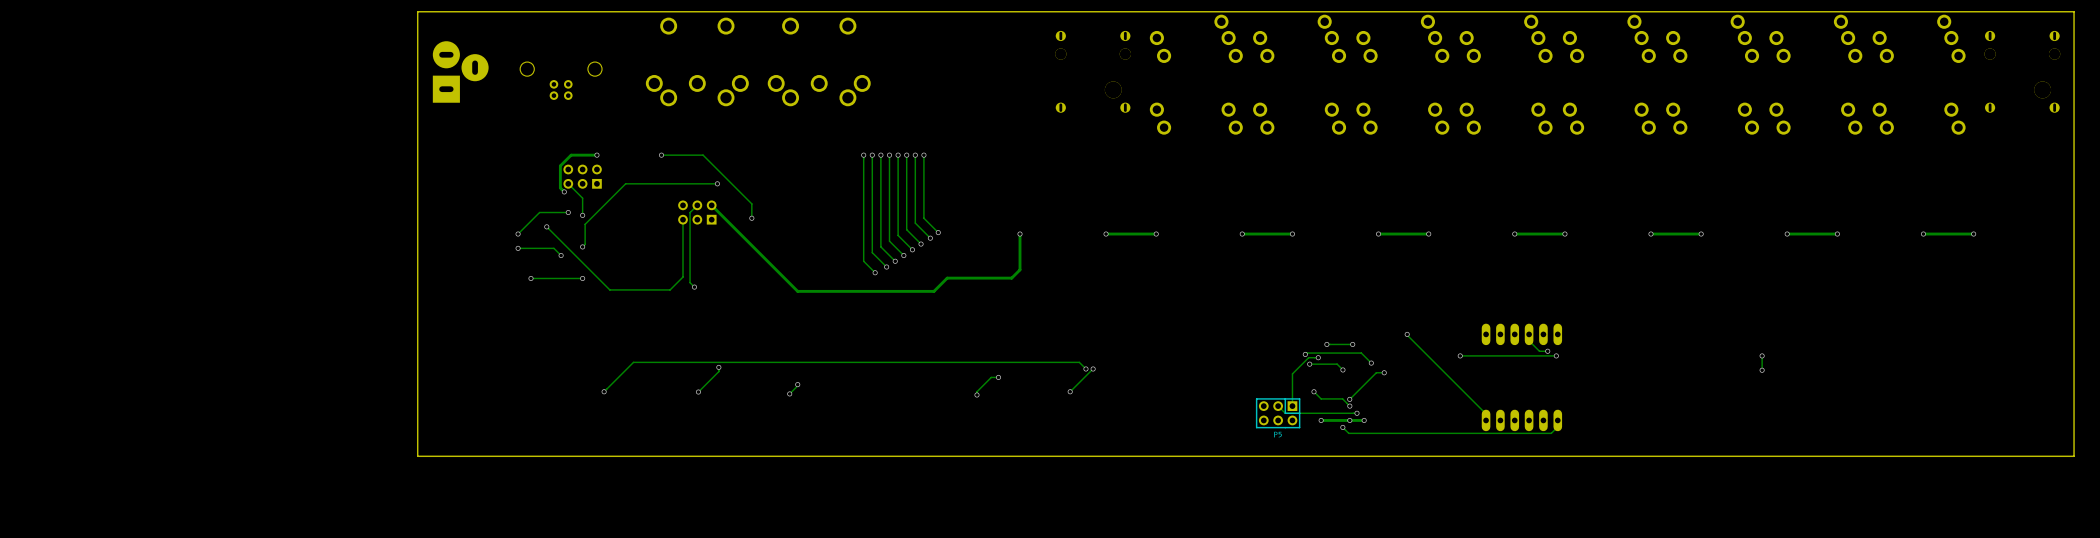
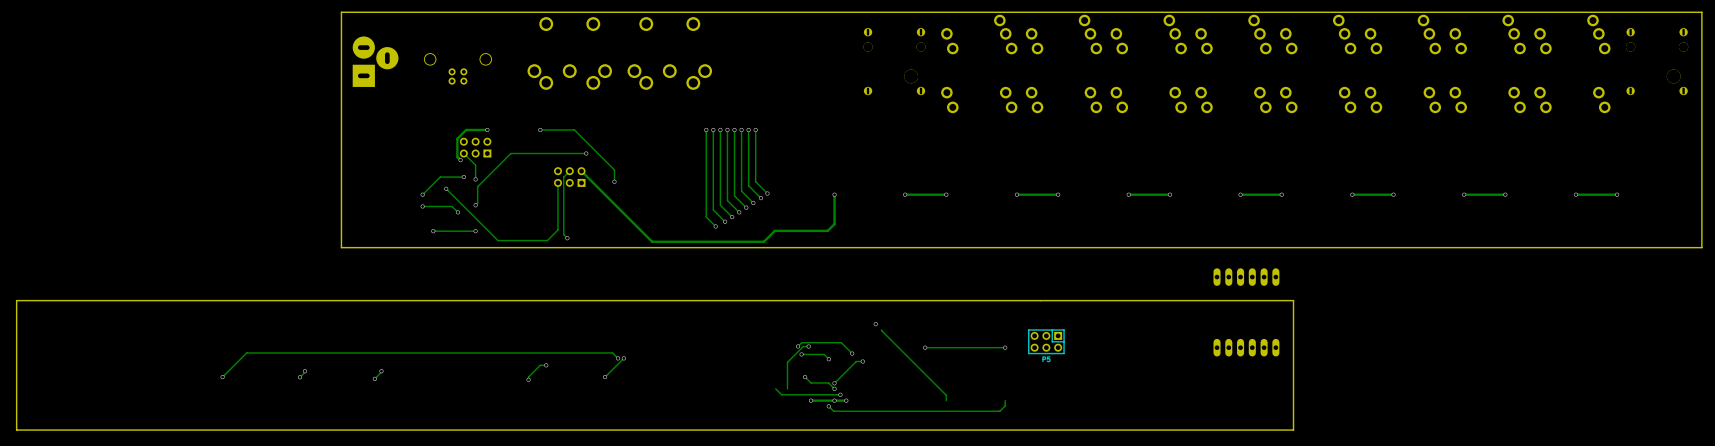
board edge: (2074, 11) (2074, 456) (417, 456) (419, 11) -> (1699, 12) (1701, 12) (1701, 247) (341, 247) (341, 12)
track: (1407, 334) (1486, 414) (1486, 420) -> none
via: (1407, 334) -> none
track: (1529, 334) (1529, 340) (1539, 351) (1547, 351) -> none
via: (1326, 344) -> none
track: (1352, 344) (1326, 344) -> none
via: (1352, 344) -> none
via: (1547, 351) -> none
track: (1305, 354) (1361, 353) (1371, 363) -> none
via: (1305, 354) -> none
via: (1460, 355) -> none
track: (1556, 355) (1460, 355) -> none
via: (1556, 355) -> none
track: (1762, 355) (1762, 370) -> none
via: (1762, 355) -> none
track: (1318, 357) (1308, 357) (1292, 373) (1292, 406) -> none
via: (1318, 357) -> none
via: (1371, 363) -> none
board edge: none -> (1293, 300) (16, 300) (16, 430) (1293, 430) (1293, 300)
track: (1309, 364) (1337, 364) (1342, 369) -> none
via: (1309, 364) -> none
track: (718, 367) (718, 371) (698, 392) -> none
via: (718, 367) -> none
track: (1085, 368) (1079, 362) (633, 362) (604, 391) -> none
via: (1085, 368) -> none
track: (1093, 368) (1070, 391) -> none
via: (1093, 368) -> none
via: (1342, 369) -> none
via: (1762, 370) -> none
track: (1384, 372) (1376, 372) (1349, 399) -> none
via: (1384, 372) -> none
track: (998, 377) (991, 377) (976, 391) (976, 395) -> none
via: (998, 377) -> none
track: (797, 384) (789, 393) -> none
via: (797, 384) -> none
via: (604, 391) -> none
track: (1313, 391) (1321, 398) (1342, 398) (1349, 406) -> none
via: (1313, 391) -> none
via: (698, 392) -> none
via: (789, 393) -> none
via: (976, 395) -> none
track: none -> (881, 330) (946, 395) (946, 400)
via: (1349, 399) -> none
track: (1278, 406) (1285, 413) (1357, 413) -> none
via: (1349, 406) -> none
via: (1357, 413) -> none
track: none -> (798, 346) (801, 342) (841, 342) (852, 353)
via: none -> (798, 346)
track: none -> (808, 346) (803, 346) (787, 362) (787, 388)
via: none -> (808, 346)
via: none -> (925, 347)
track: none -> (1005, 347) (925, 347)
via: none -> (1005, 347)
via: (1321, 420) -> none
via: (1349, 420) -> none
track: (1364, 420) (1321, 420) -> none
via: (1364, 420) -> none
track: (1557, 420) (1557, 426) (1551, 433) (1348, 433) (1342, 427) -> none
via: none -> (852, 353)
via: (1342, 427) -> none
track: none -> (801, 354) (824, 354) (828, 359)
via: none -> (801, 354)
track: none -> (618, 358) (612, 352) (246, 352) (222, 377)
via: none -> (618, 358)
track: none -> (623, 358) (605, 377)
via: none -> (623, 358)
via: none -> (828, 359)
track: none -> (862, 361) (856, 361) (834, 383)
via: none -> (862, 361)
track: none -> (546, 365) (540, 365) (528, 377) (528, 379)
via: none -> (546, 365)
track: none -> (304, 371) (299, 377)
via: none -> (304, 371)
track: none -> (381, 371) (374, 378)
via: none -> (381, 371)
via: none -> (222, 377)
via: none -> (299, 377)
via: none -> (605, 377)
track: none -> (805, 377) (811, 382) (828, 382) (834, 388)
via: none -> (805, 377)
via: none -> (374, 378)
via: none -> (528, 379)
via: none -> (834, 383)
track: none -> (775, 388) (781, 394) (840, 394)
via: none -> (834, 388)
via: none -> (840, 394)
via: none -> (811, 400)
via: none -> (834, 400)
track: none -> (846, 400) (811, 400)
via: none -> (846, 400)
track: none -> (1005, 400) (1005, 405) (999, 411) (833, 411) (828, 406)
via: none -> (828, 406)

